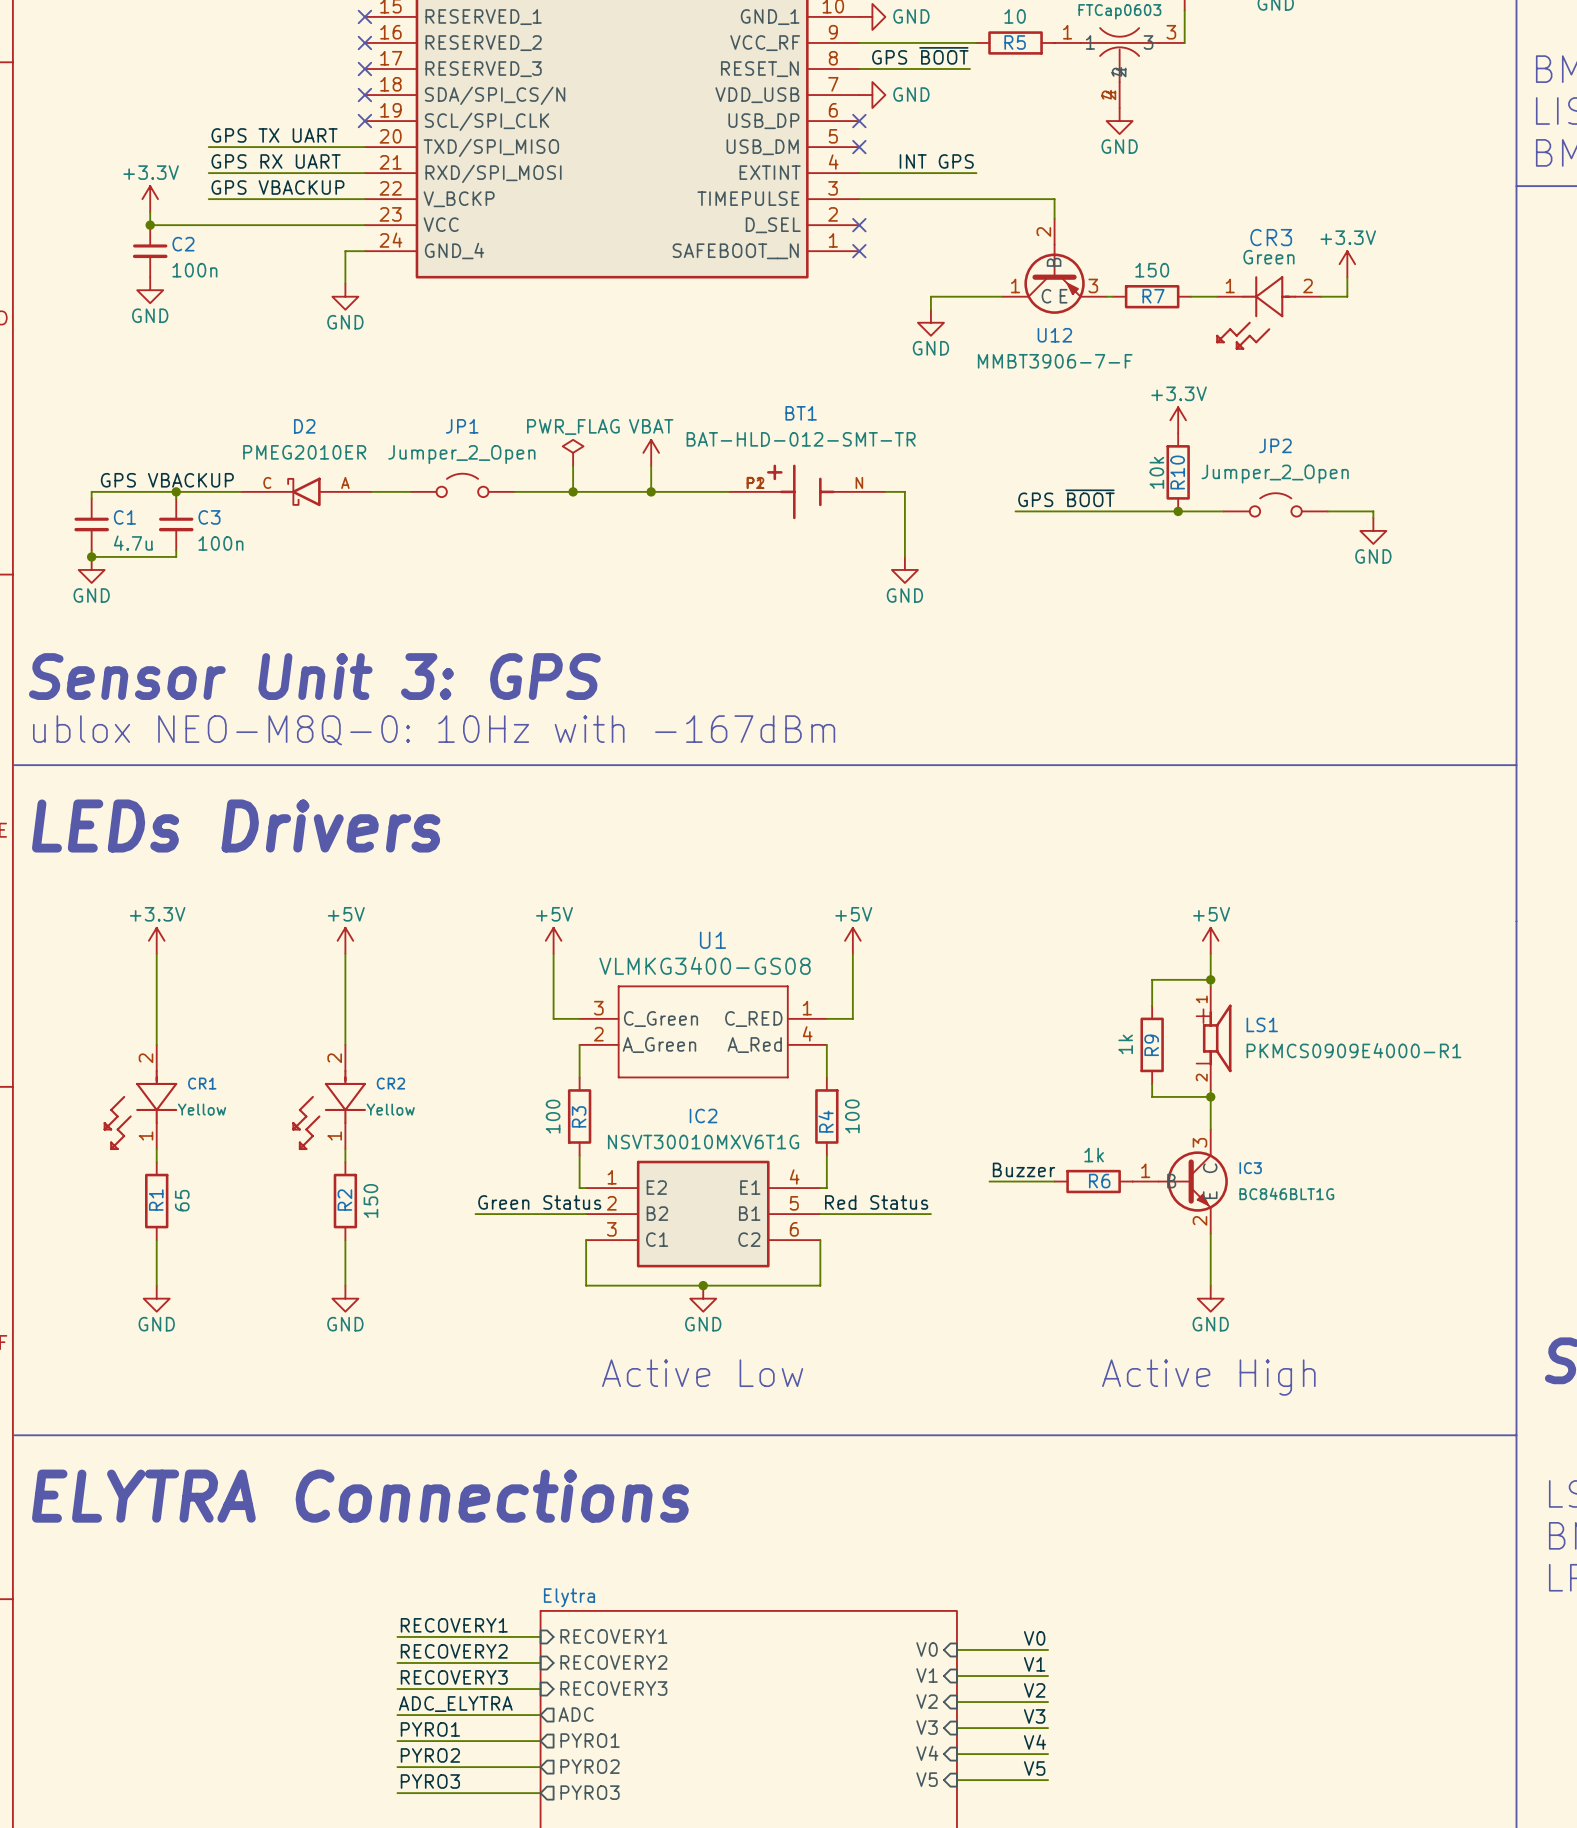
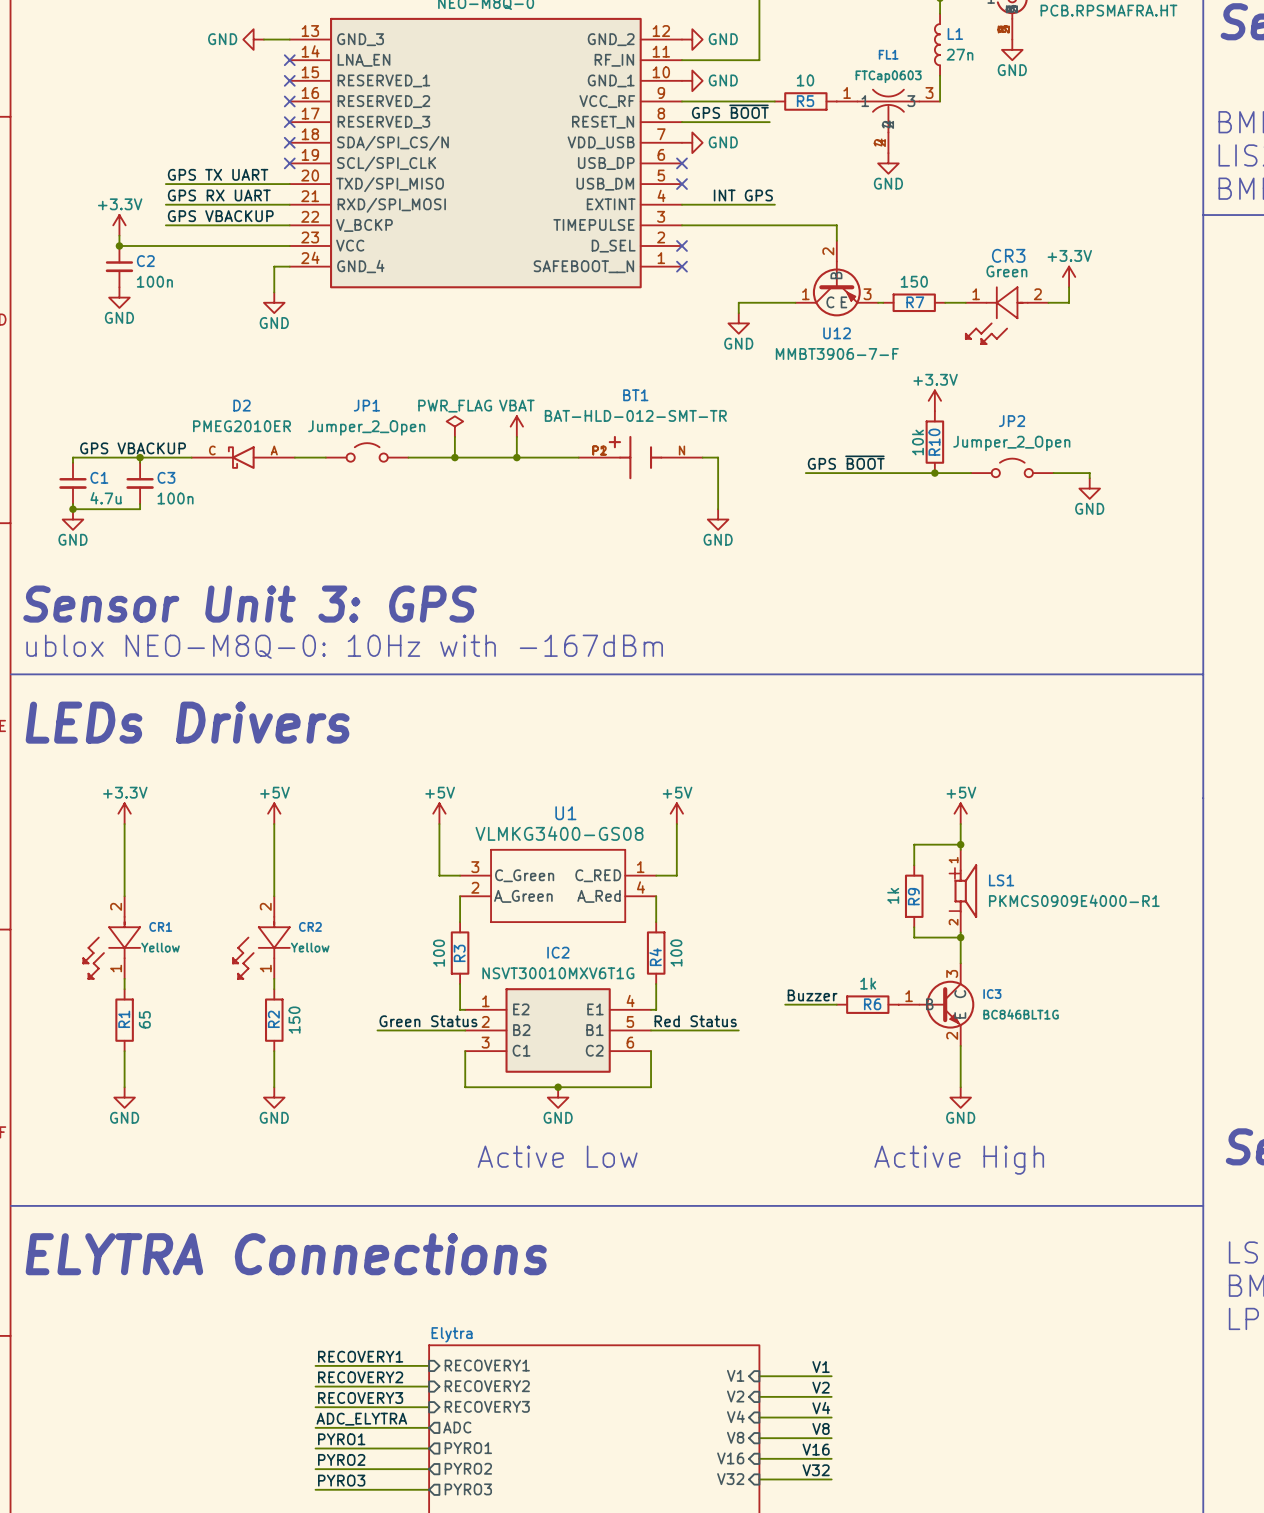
label: V0 (1034, 1638) -> V1 (821, 1367)
sheet pin: V0 (927, 1649) -> V1 (735, 1375)
label: V1 (1034, 1664) -> V2 (821, 1387)
sheet pin: V1 (927, 1675) -> V2 (735, 1396)
label: V2 (1034, 1690) -> V4 (821, 1408)
sheet pin: V2 (927, 1701) -> V4 (735, 1416)
label: V3 (1034, 1716) -> V8 (821, 1428)
sheet pin: V3 (927, 1727) -> V8 (735, 1437)
label: V4 (1034, 1742) -> V16 (816, 1449)
sheet pin: V4 (927, 1753) -> V16 (730, 1458)
label: V5 (1034, 1768) -> V32 (816, 1470)
sheet pin: V5 (927, 1779) -> V32 (730, 1479)

